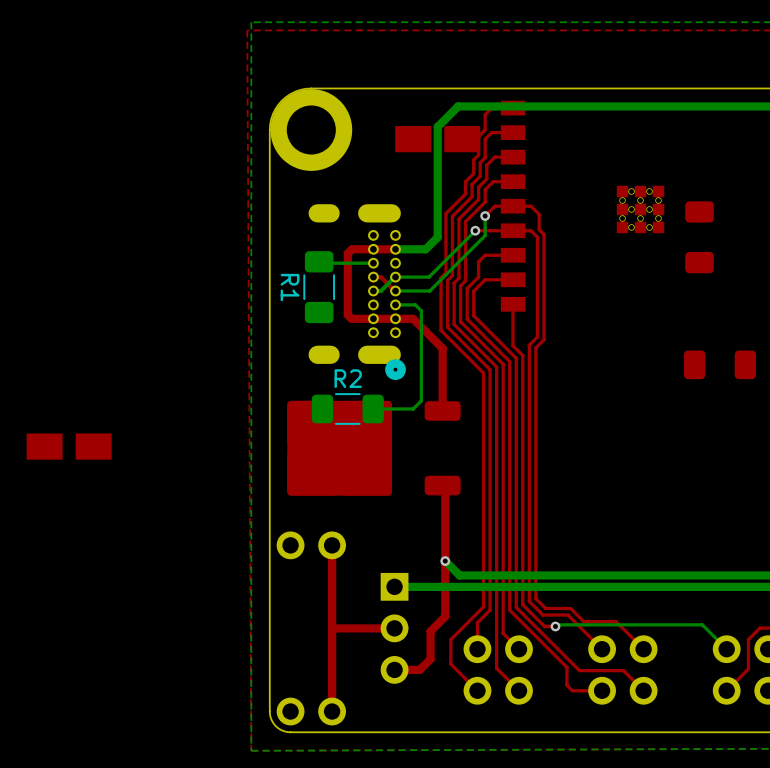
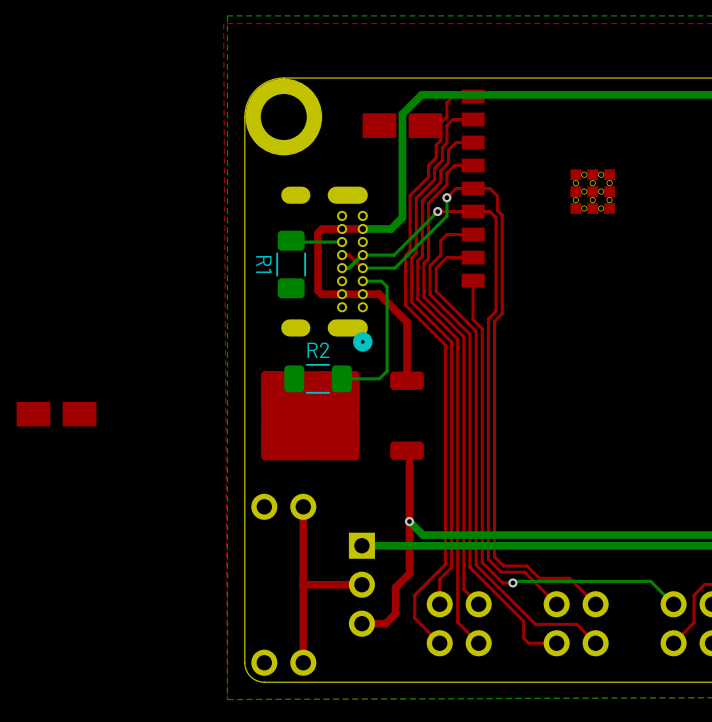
part: (699, 237) -> none
part: (719, 364) -> none

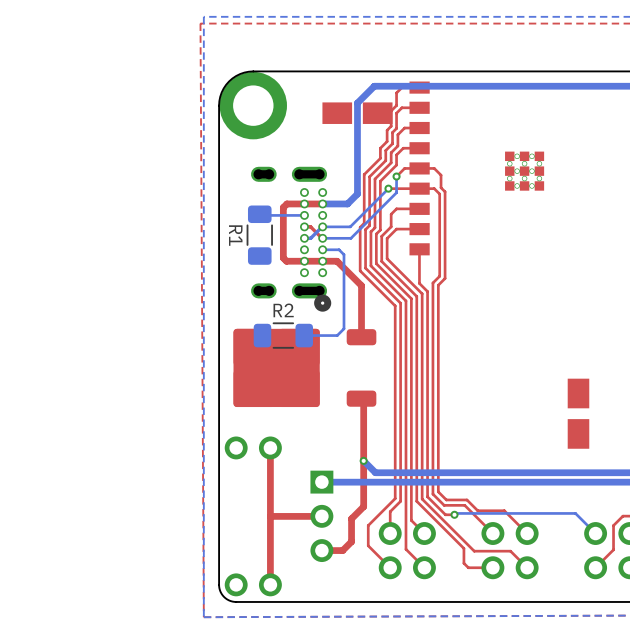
part: (56, 414) -> none
part: none -> (578, 413)

